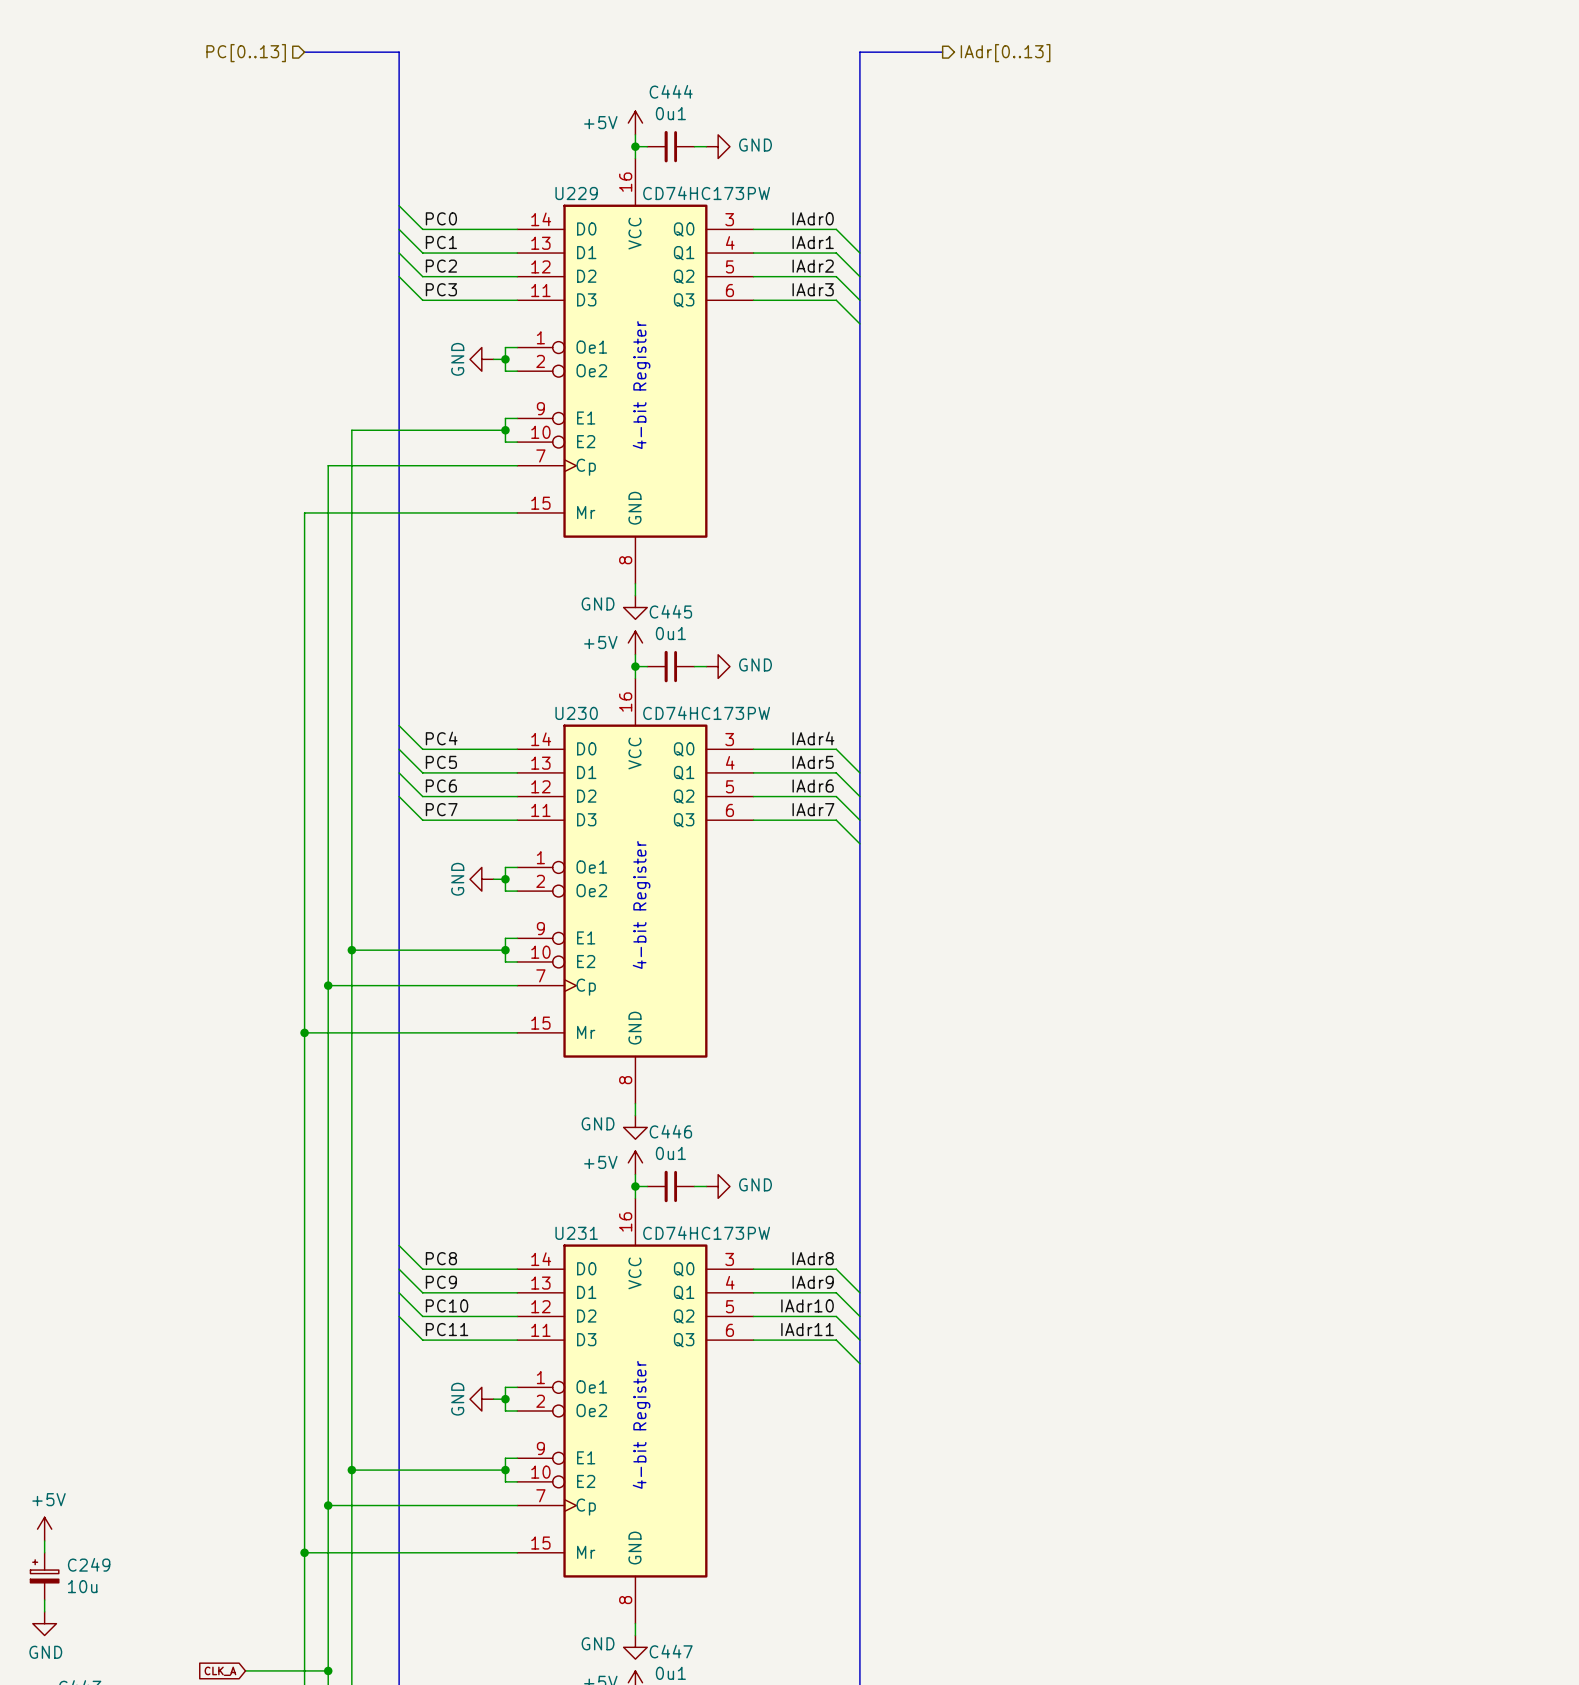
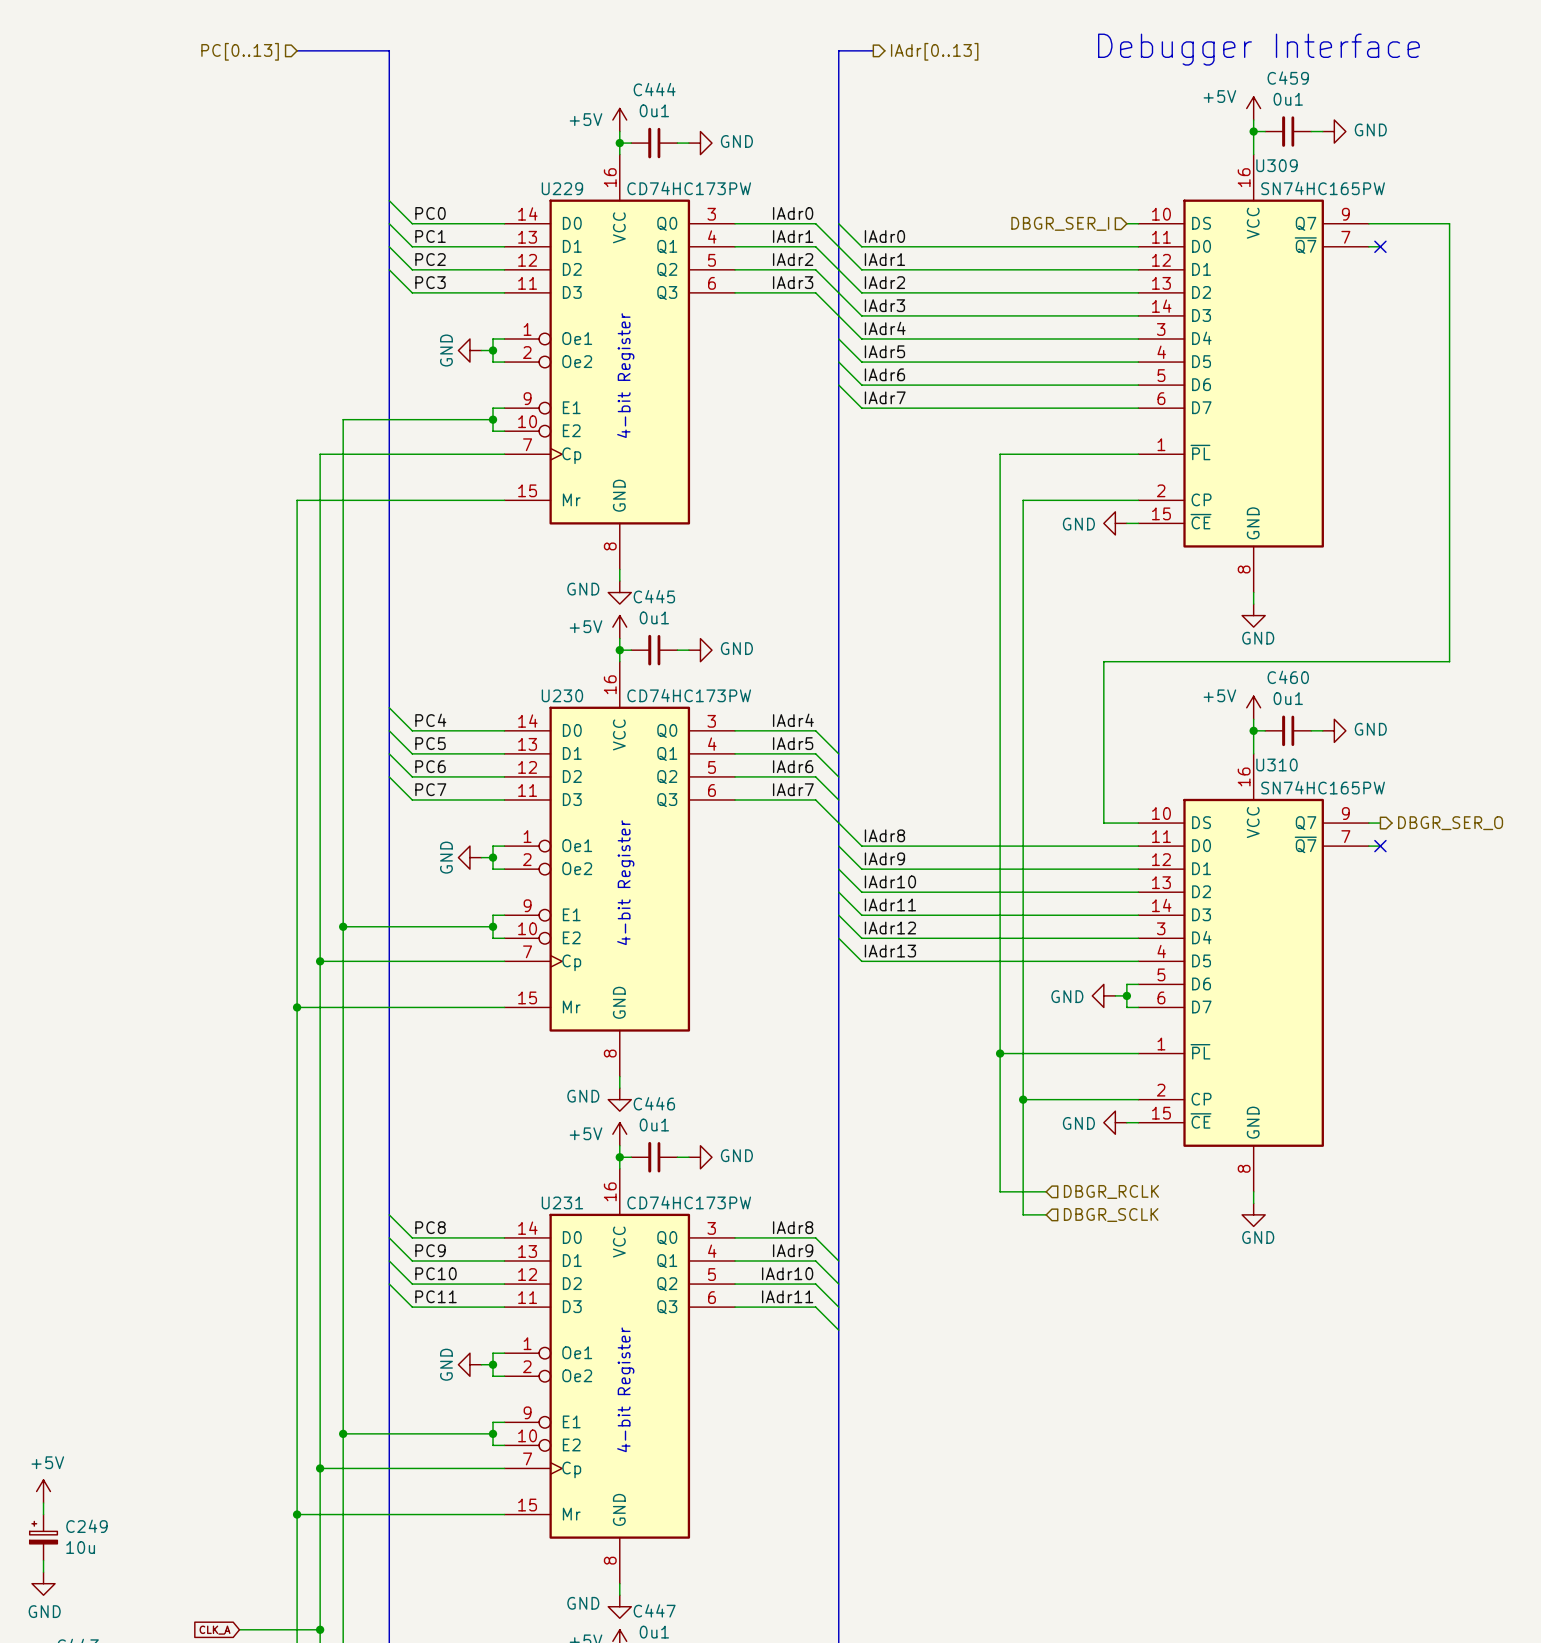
text: none -> Debugger Interface (1258, 49)
bus: (895, 52) (942, 52) -> none
hierarchical label position: IAdr[0..13] (1005, 53) -> IAdr[0..13] (934, 51)
power symbol: none -> +5V (1253, 108)
wire: none -> (1253, 120) (1253, 154)
wire: none -> (1253, 131) (1265, 131)
junction: none -> (1253, 131)
C459: none -> 0u1 (1288, 131)
wire: none -> (1311, 131) (1322, 131)
power symbol: none -> GND (1334, 131)
wire: none -> (838, 223) (861, 246) (1138, 246)
hierarchical label: none -> DBGR_SER_I (1060, 223)
wire: none -> (1126, 223) (1138, 223)
wire: none -> (1368, 223) (1449, 223) (1449, 661) (1103, 661) (1103, 823) (1138, 823)
label: none -> IAdr0 (884, 236)
wire: none -> (838, 246) (861, 269) (1138, 269)
wire: none -> (1368, 246) (1380, 246)
no-connect mark: none -> (1380, 246)
label: none -> IAdr1 (884, 259)
wire: none -> (838, 269) (861, 292) (1138, 292)
label: none -> IAdr2 (884, 282)
wire: none -> (838, 292) (861, 315) (1138, 315)
label: none -> IAdr3 (884, 305)
wire: none -> (838, 315) (861, 338) (1138, 338)
label: none -> IAdr4 (885, 328)
wire: none -> (838, 338) (861, 362) (1138, 362)
label: none -> IAdr5 (884, 351)
wire: none -> (838, 362) (861, 385) (1138, 385)
U309: none -> SN74HC165PW (1253, 373)
label: none -> IAdr6 (884, 374)
wire: none -> (838, 385) (861, 408) (1138, 408)
label: none -> IAdr7 (885, 397)
wire: none -> (1138, 454) (1000, 454) (1000, 1191) (1046, 1191)
wire: none -> (1138, 500) (1023, 500) (1023, 1214) (1046, 1214)
power symbol: none -> GND (1115, 523)
wire: none -> (1126, 523) (1138, 523)
wire: none -> (1253, 592) (1253, 604)
power symbol: none -> GND (1253, 615)
power symbol: none -> +5V (1253, 707)
wire: none -> (1253, 719) (1253, 753)
wire: none -> (1253, 730) (1265, 730)
junction: none -> (1253, 730)
C460: none -> 0u1 (1288, 730)
wire: none -> (1311, 730) (1322, 730)
power symbol: none -> GND (1334, 730)
wire: none -> (838, 823) (861, 846) (1138, 846)
wire: none -> (1368, 823) (1380, 823)
hierarchical label: none -> DBGR_SER_O (1450, 823)
label: none -> IAdr8 (884, 835)
wire: none -> (838, 846) (861, 869) (1138, 869)
wire: none -> (1368, 846) (1380, 846)
no-connect mark: none -> (1380, 846)
label: none -> IAdr9 (884, 858)
wire: none -> (838, 869) (861, 892) (1138, 892)
label: none -> IAdr10 (890, 881)
wire: none -> (838, 892) (861, 915) (1138, 915)
label: none -> IAdr11 (890, 904)
wire: none -> (838, 915) (861, 938) (1138, 938)
label: none -> IAdr12 (890, 928)
wire: none -> (838, 938) (861, 961) (1138, 961)
label: none -> IAdr13 (890, 951)
U310: none -> SN74HC165PW (1253, 972)
wire: none -> (1138, 984) (1126, 984) (1126, 1007) (1138, 1007)
power symbol: none -> GND (1103, 995)
wire: none -> (1115, 995) (1126, 995)
junction: none -> (1126, 995)
wire: none -> (1000, 1053) (1138, 1053)
junction: none -> (1000, 1053)
wire: none -> (1023, 1099) (1138, 1099)
junction: none -> (1023, 1099)
power symbol: none -> GND (1115, 1122)
wire: none -> (1126, 1122) (1138, 1122)
wire: none -> (1253, 1191) (1253, 1203)
hierarchical label: none -> DBGR_RCLK (1111, 1191)
hierarchical label: none -> DBGR_SCLK (1111, 1215)
power symbol: none -> GND (1253, 1214)

